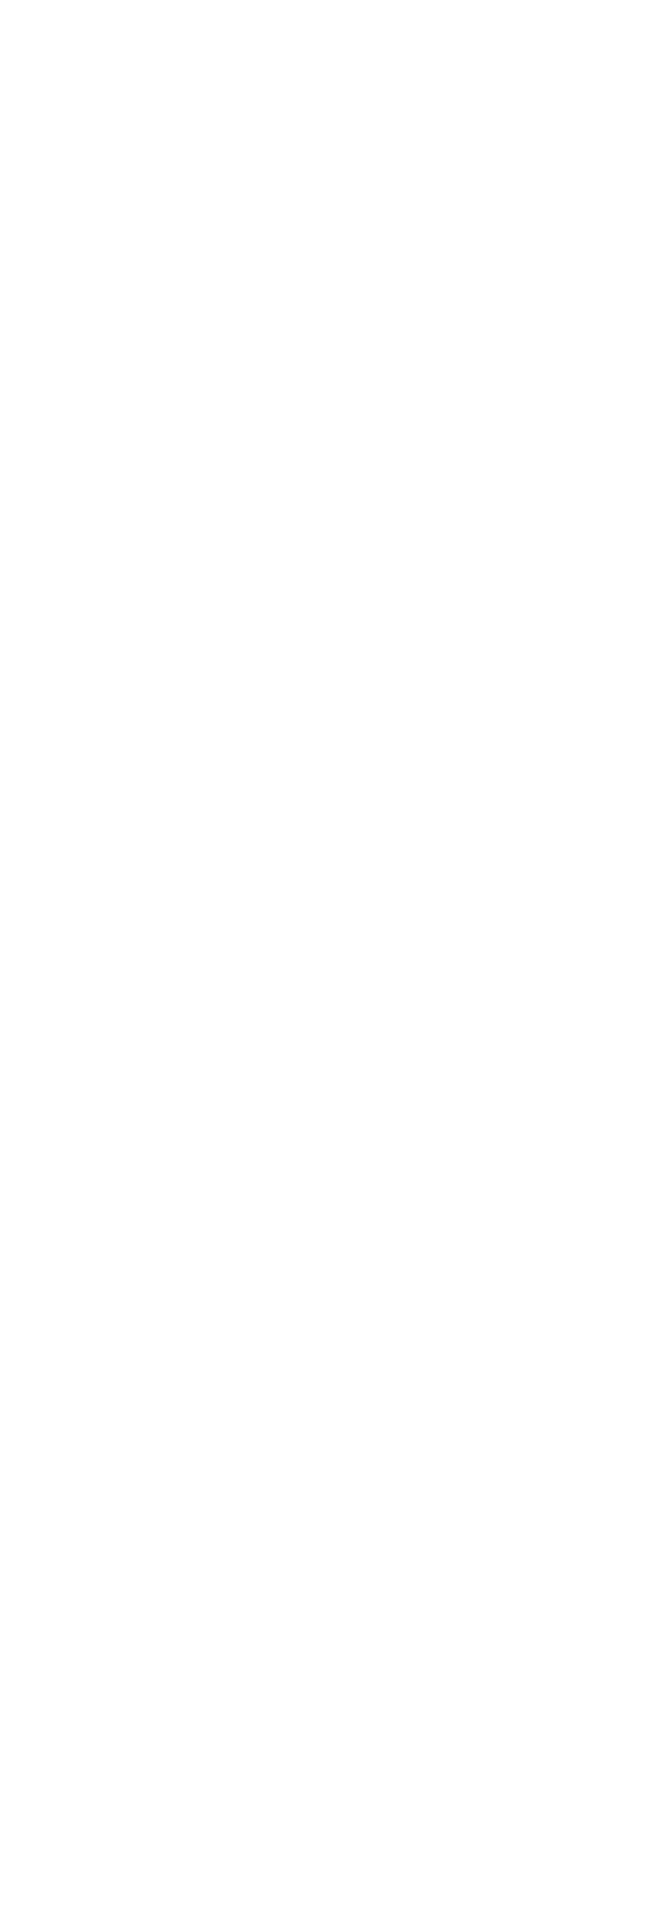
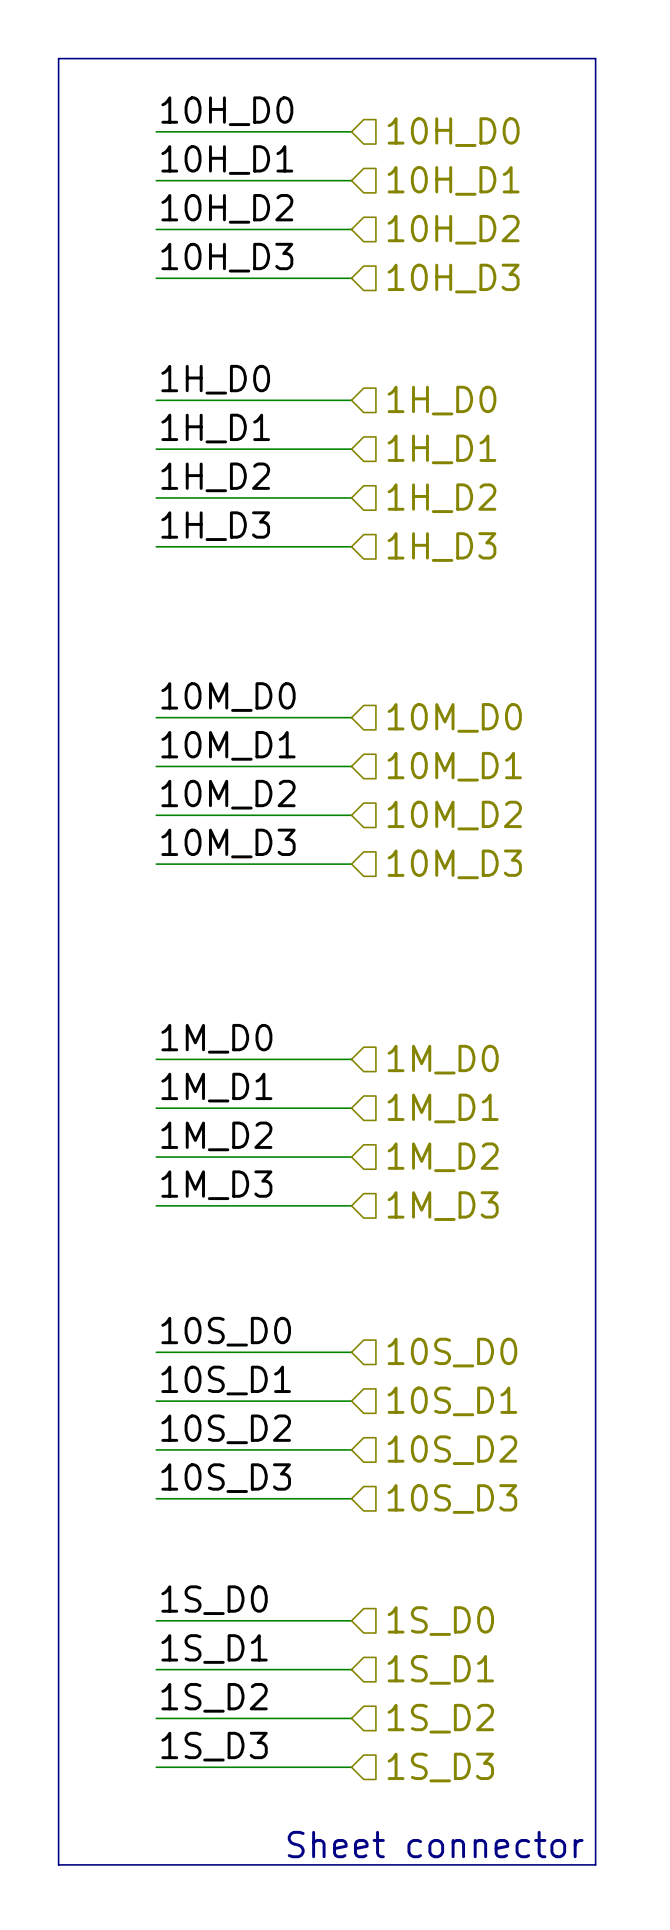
line: none -> (58, 58) (595, 58) (595, 1864) (58, 1864) (58, 58)
label: none -> 10H_D0 (227, 111)
wire: none -> (156, 131) (351, 131)
hierarchical label: none -> 10H_D0 (453, 132)
label: none -> 10H_D1 (227, 160)
wire: none -> (156, 180) (351, 180)
hierarchical label: none -> 10H_D1 (453, 180)
label: none -> 10H_D2 (227, 208)
wire: none -> (156, 229) (351, 229)
hierarchical label: none -> 10H_D2 (453, 229)
label: none -> 10H_D3 (227, 257)
wire: none -> (156, 278) (351, 278)
hierarchical label: none -> 10H_D3 (453, 278)
label: none -> 1H_D0 (215, 379)
wire: none -> (156, 400) (351, 400)
hierarchical label: none -> 1H_D0 (441, 400)
label: none -> 1H_D1 (215, 428)
wire: none -> (156, 449) (351, 449)
hierarchical label: none -> 1H_D1 (441, 449)
label: none -> 1H_D2 (215, 477)
wire: none -> (156, 497) (351, 497)
hierarchical label: none -> 1H_D2 (441, 498)
label: none -> 1H_D3 (215, 526)
wire: none -> (156, 546) (351, 546)
hierarchical label: none -> 1H_D3 (441, 547)
label: none -> 10M_D0 (228, 697)
wire: none -> (156, 717) (351, 717)
hierarchical label: none -> 10M_D0 (454, 717)
label: none -> 10M_D1 (228, 745)
wire: none -> (156, 766) (351, 766)
hierarchical label: none -> 10M_D1 (454, 766)
label: none -> 10M_D2 (228, 794)
wire: none -> (156, 815) (351, 815)
hierarchical label: none -> 10M_D2 (454, 815)
label: none -> 10M_D3 (228, 843)
wire: none -> (156, 864) (351, 864)
hierarchical label: none -> 10M_D3 (454, 864)
label: none -> 1M_D0 (216, 1038)
wire: none -> (156, 1059) (351, 1059)
hierarchical label: none -> 1M_D0 (443, 1059)
label: none -> 1M_D1 (216, 1087)
wire: none -> (156, 1108) (351, 1108)
hierarchical label: none -> 1M_D1 (443, 1108)
label: none -> 1M_D2 (216, 1136)
wire: none -> (156, 1157) (351, 1157)
hierarchical label: none -> 1M_D2 (443, 1157)
label: none -> 1M_D3 (216, 1185)
wire: none -> (156, 1205) (351, 1205)
hierarchical label: none -> 1M_D3 (443, 1206)
label: none -> 10S_D0 (226, 1331)
wire: none -> (156, 1352) (351, 1352)
hierarchical label: none -> 10S_D0 (452, 1352)
label: none -> 10S_D1 (226, 1380)
wire: none -> (156, 1401) (351, 1401)
hierarchical label: none -> 10S_D1 (452, 1401)
label: none -> 10S_D2 (226, 1429)
wire: none -> (156, 1449) (351, 1449)
hierarchical label: none -> 10S_D2 (452, 1450)
label: none -> 10S_D3 (226, 1478)
wire: none -> (156, 1498) (351, 1498)
hierarchical label: none -> 10S_D3 (452, 1499)
label: none -> 1S_D0 (214, 1600)
wire: none -> (156, 1620) (351, 1620)
hierarchical label: none -> 1S_D0 (440, 1621)
label: none -> 1S_D1 (214, 1649)
wire: none -> (156, 1669) (351, 1669)
hierarchical label: none -> 1S_D1 (440, 1669)
label: none -> 1S_D2 (214, 1697)
wire: none -> (156, 1718) (351, 1718)
hierarchical label: none -> 1S_D2 (440, 1718)
label: none -> 1S_D3 (214, 1746)
wire: none -> (156, 1767) (351, 1767)
hierarchical label: none -> 1S_D3 (440, 1767)
text: none -> Sheet connector (435, 1844)

